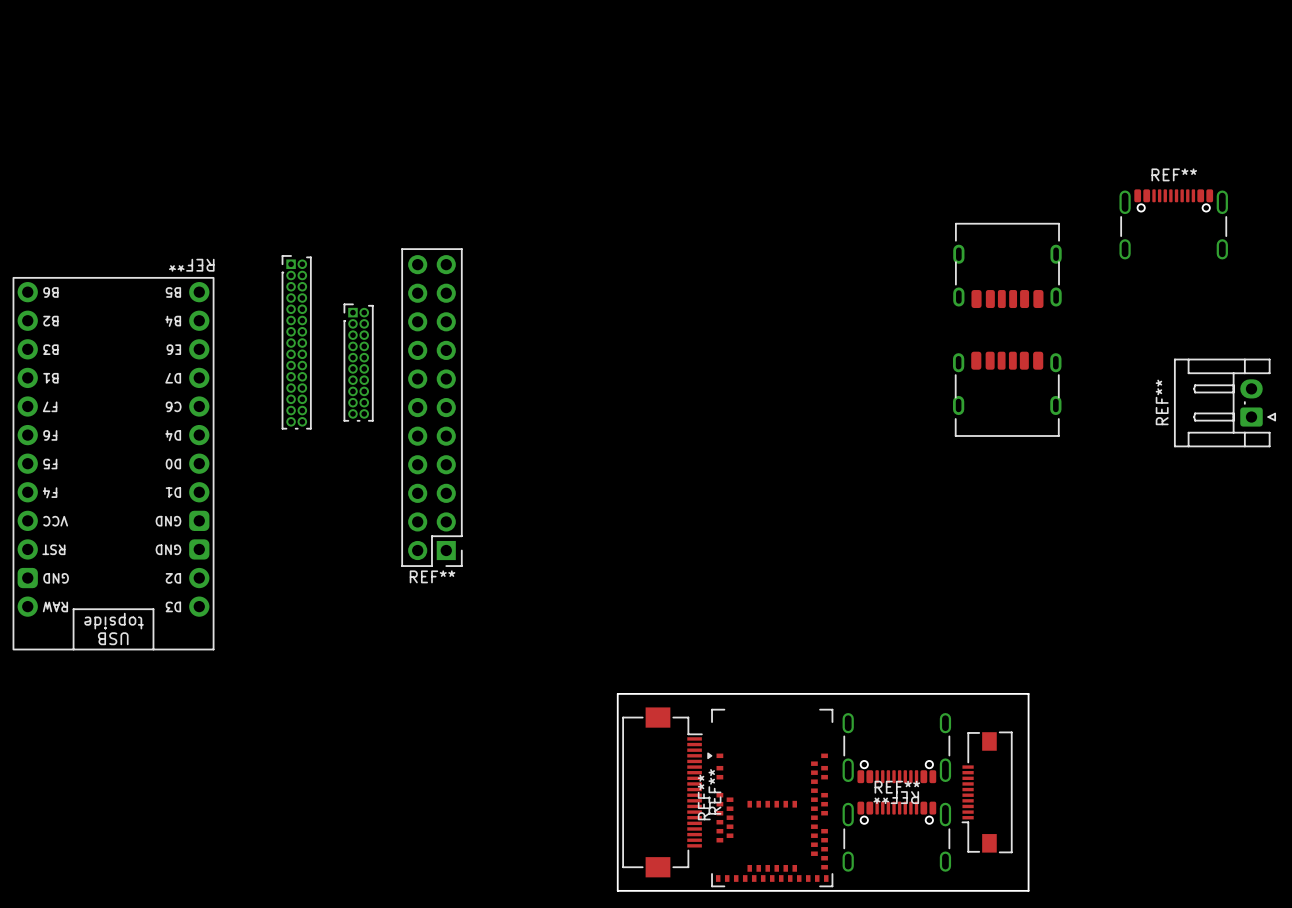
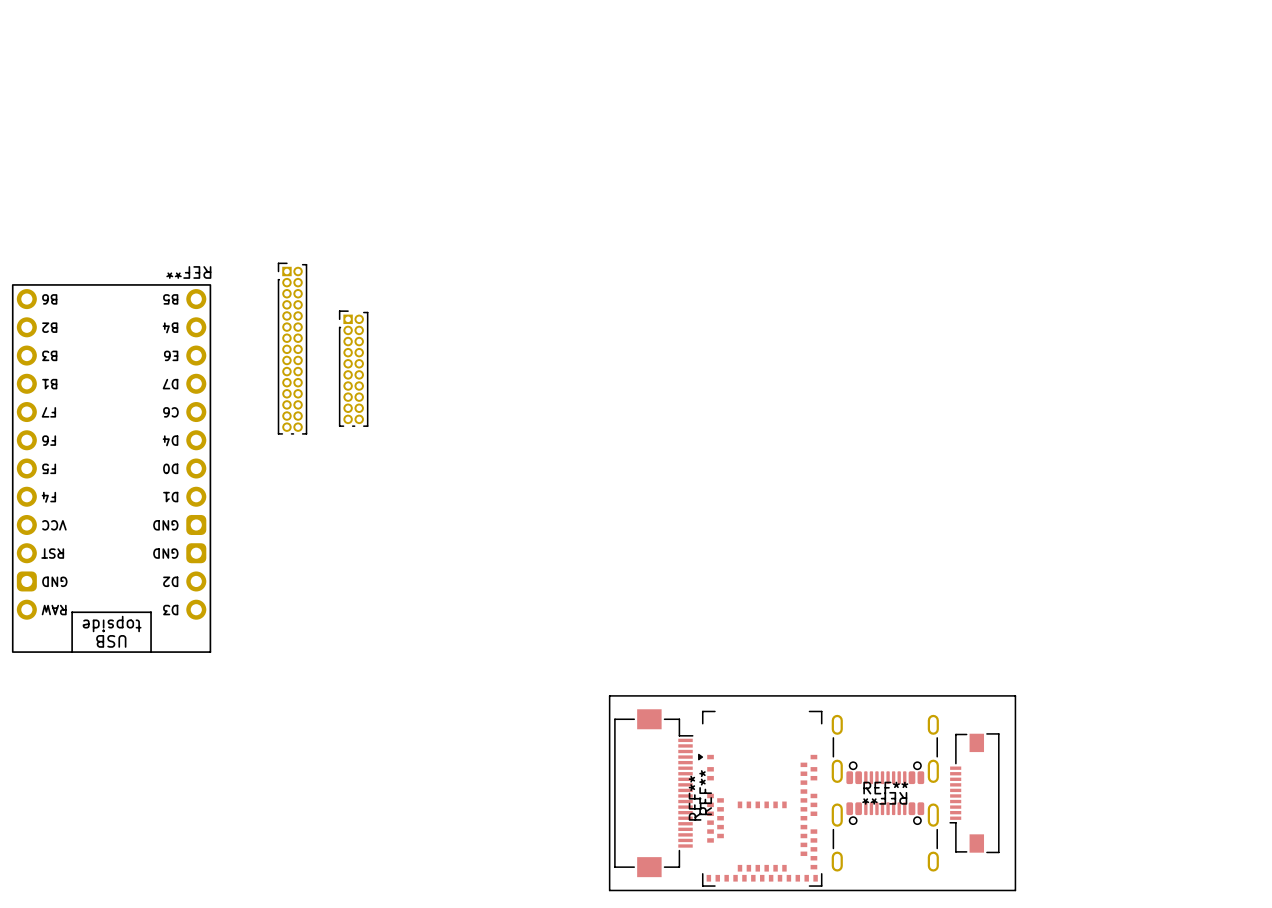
REF**: (1173, 224) -> none
part: (1007, 265) -> none
part: (1007, 394) -> none
REF**: (1225, 402) -> none
REF**: (431, 407) -> none

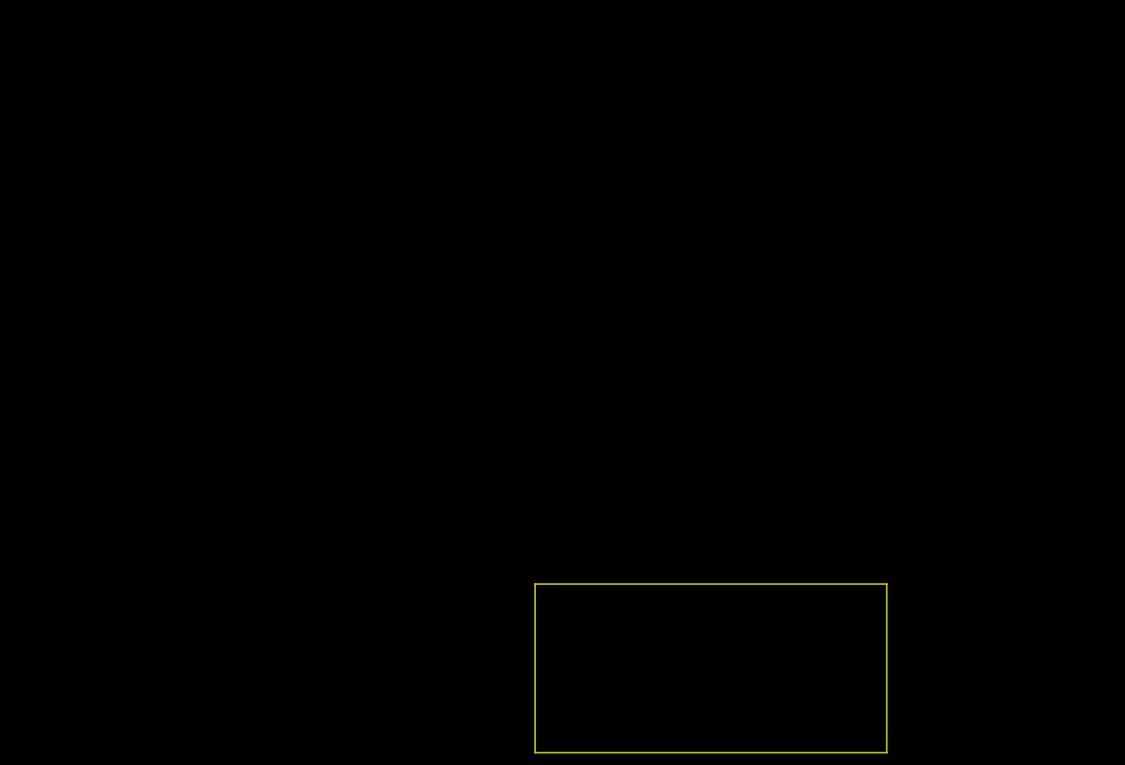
part: (292, 348) -> none
part: (353, 368) -> none
REF**: (111, 468) -> none
REF**: (885, 749) -> none
REF**: (653, 793) -> none
part: (974, 793) -> none
REF**: (760, 798) -> none
REF**: (885, 836) -> none

